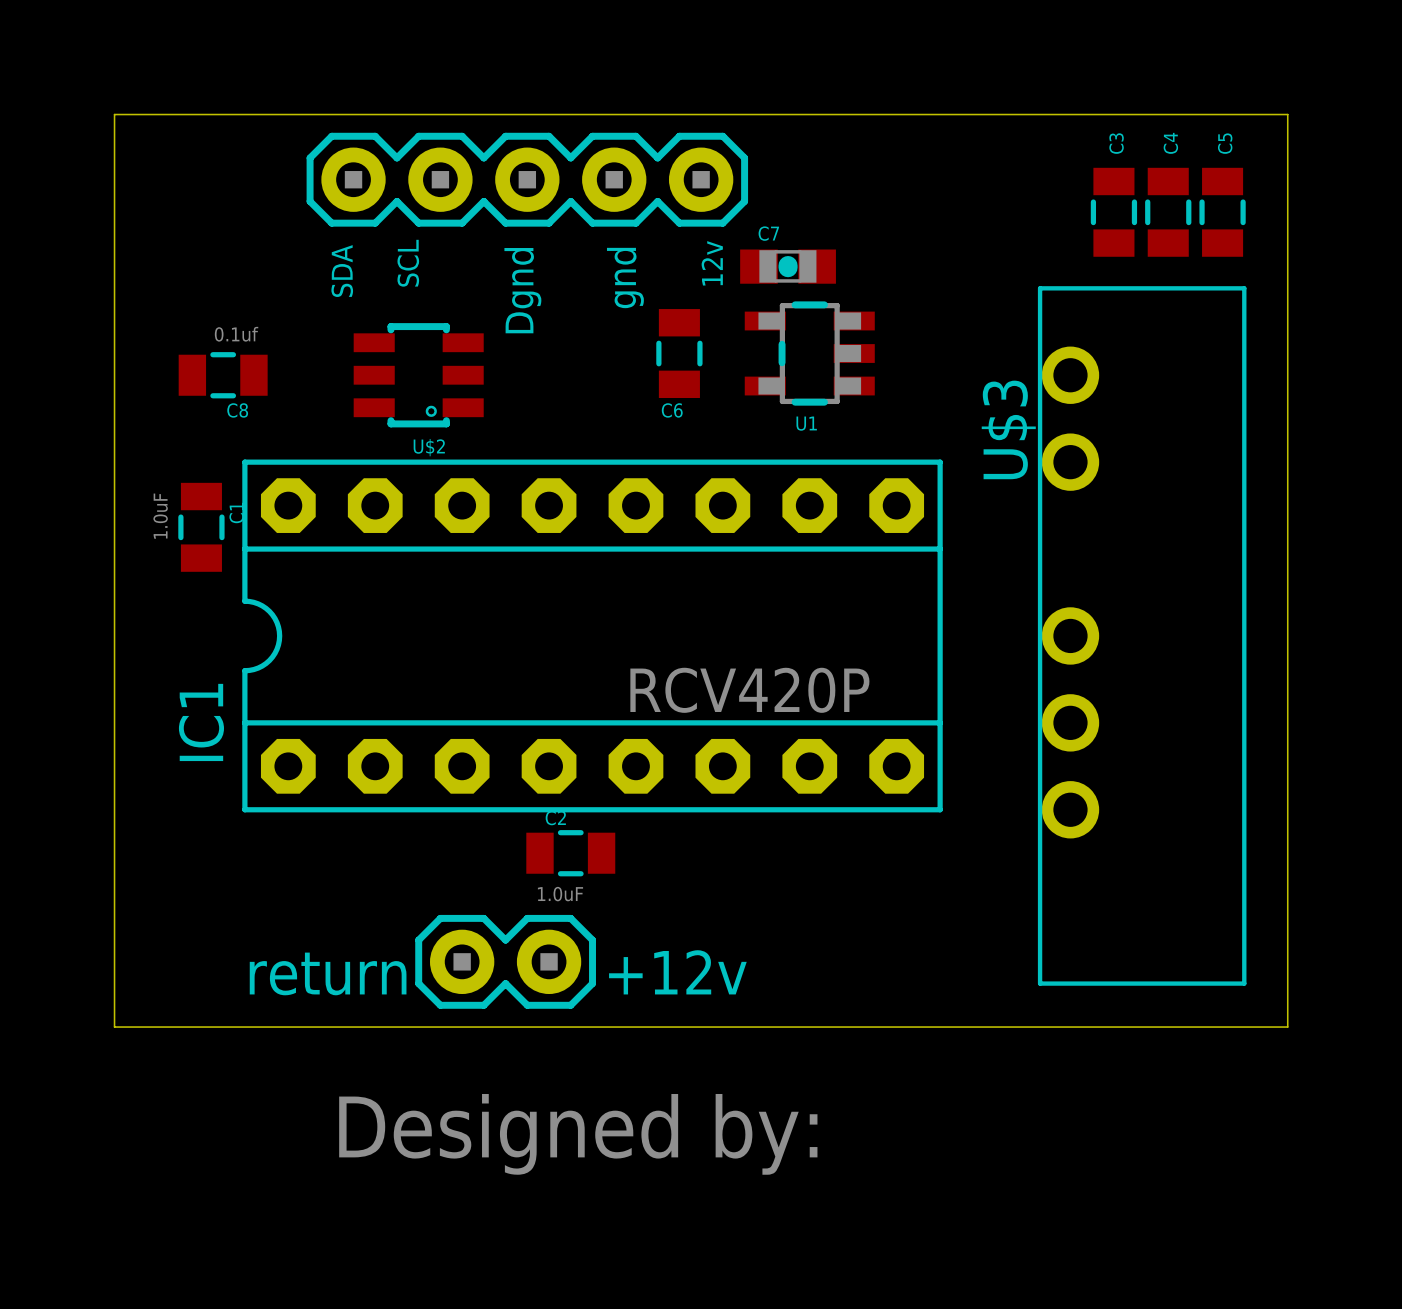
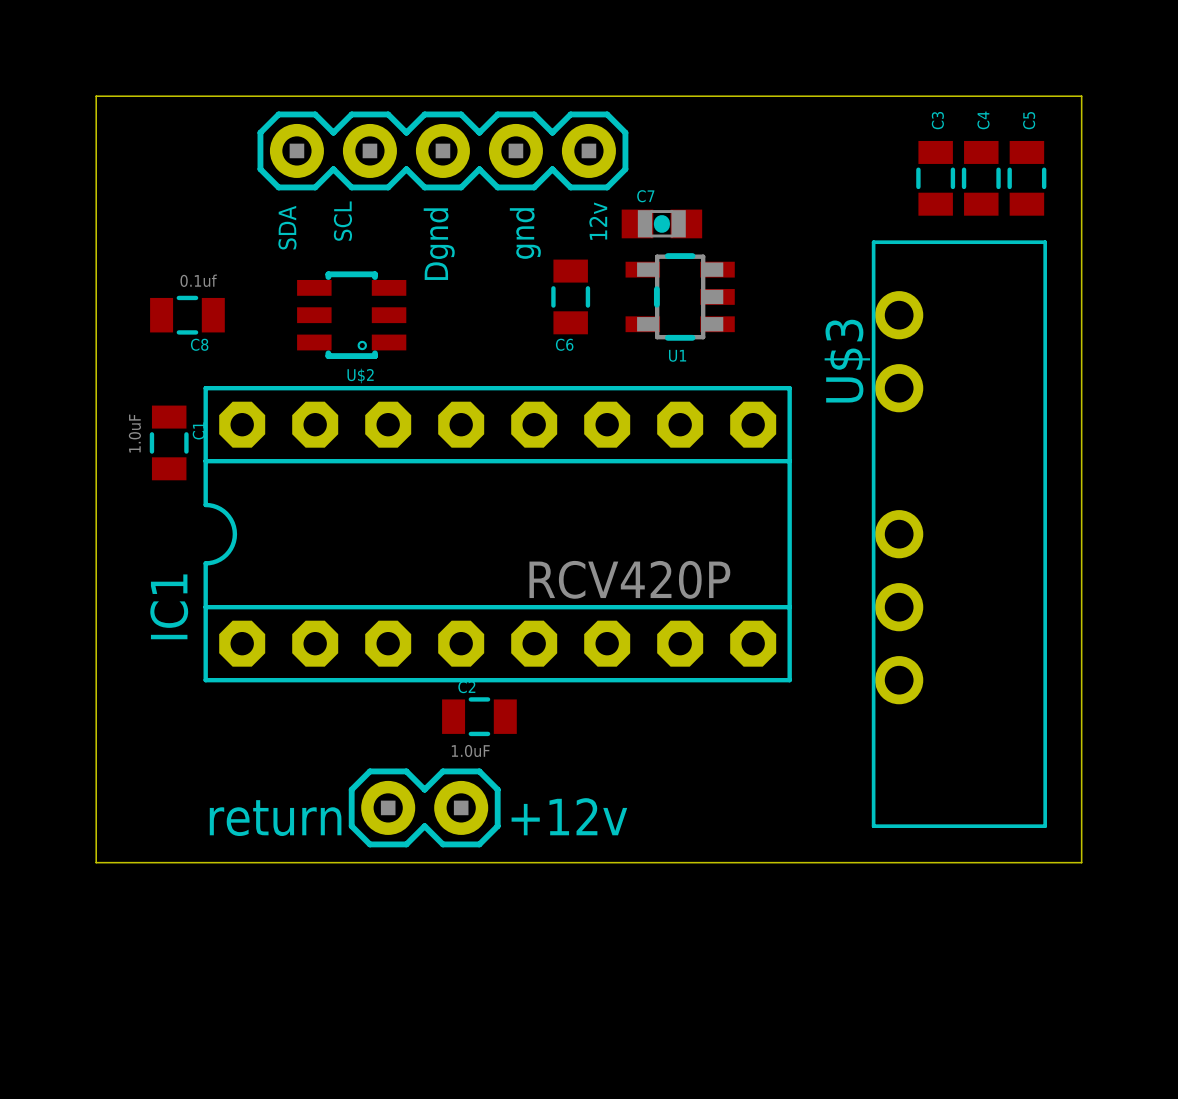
drawing: [339, 1093, 818, 1175] -> none

